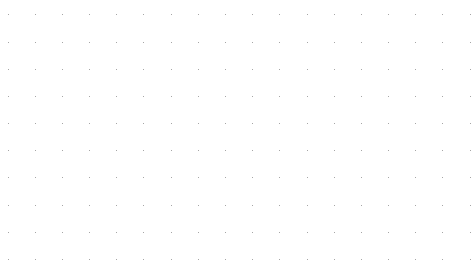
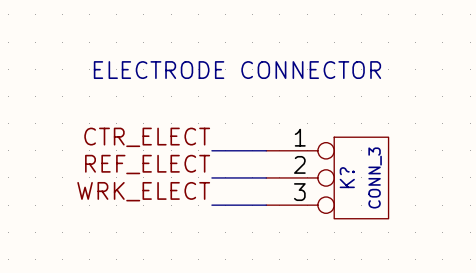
text: none -> ELECTRODE CONNECTOR (237, 70)
label: none -> CTR_ELECT (147, 137)
wire: none -> (211, 150) (266, 150)
label: none -> REF_ELECT (147, 164)
wire: none -> (211, 177) (266, 177)
K?: none -> CONN_3 (327, 177)
label: none -> WRK_ELECT (143, 191)
wire: none -> (211, 205) (266, 205)

